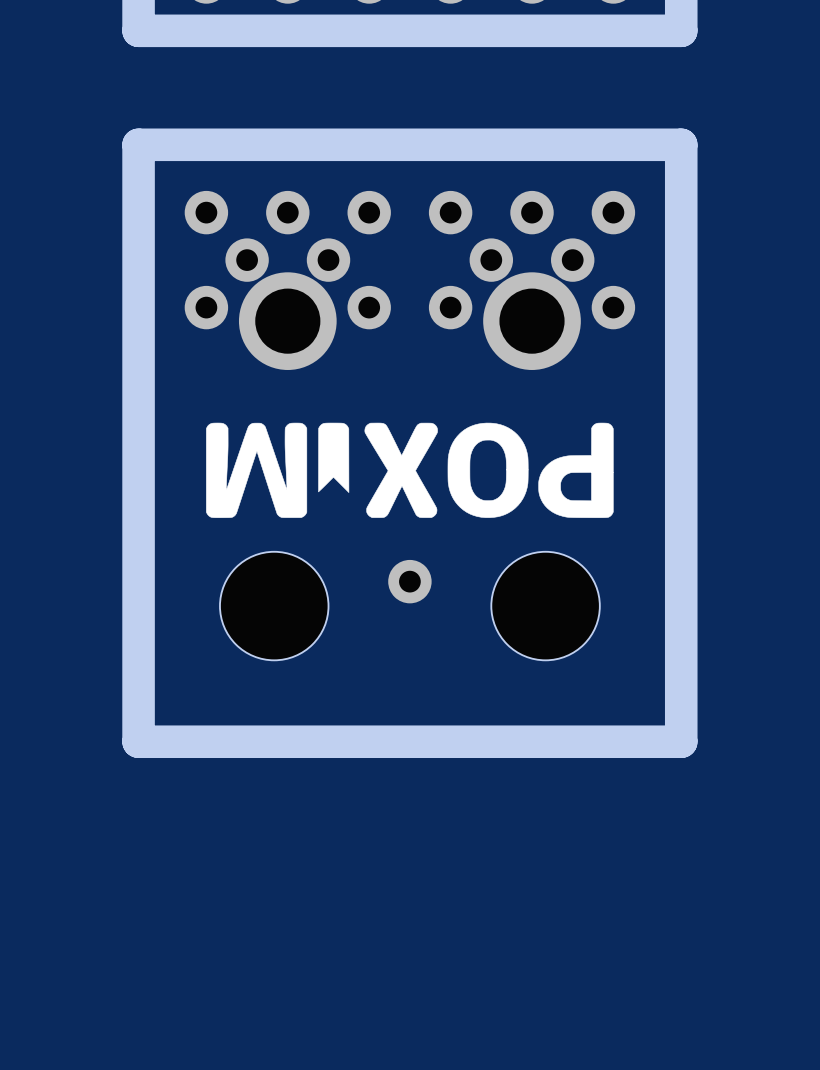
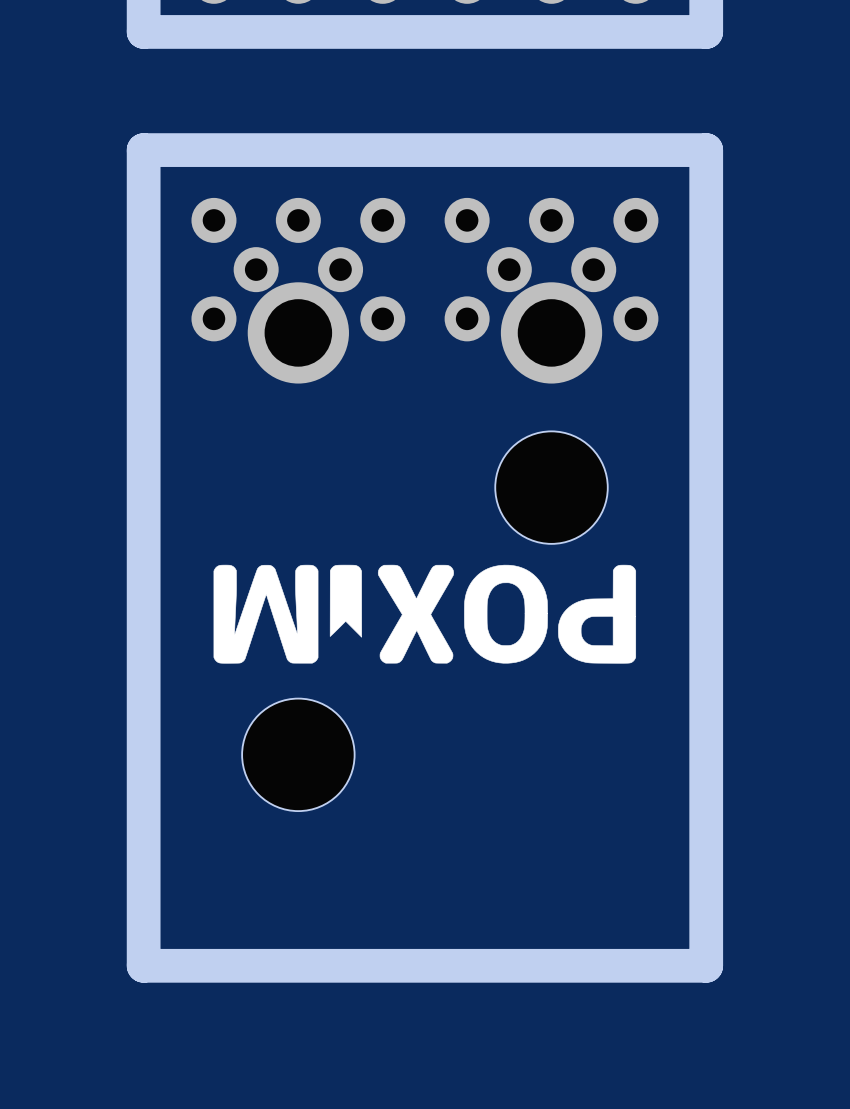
drawing position: (409, 470) -> (424, 614)
via: (409, 581) -> none
part position: (274, 606) -> (298, 754)
part position: (545, 606) -> (551, 487)
board edge: (681, 741) (138, 741) -> (706, 768) (706, 965) (143, 965) (143, 768)

